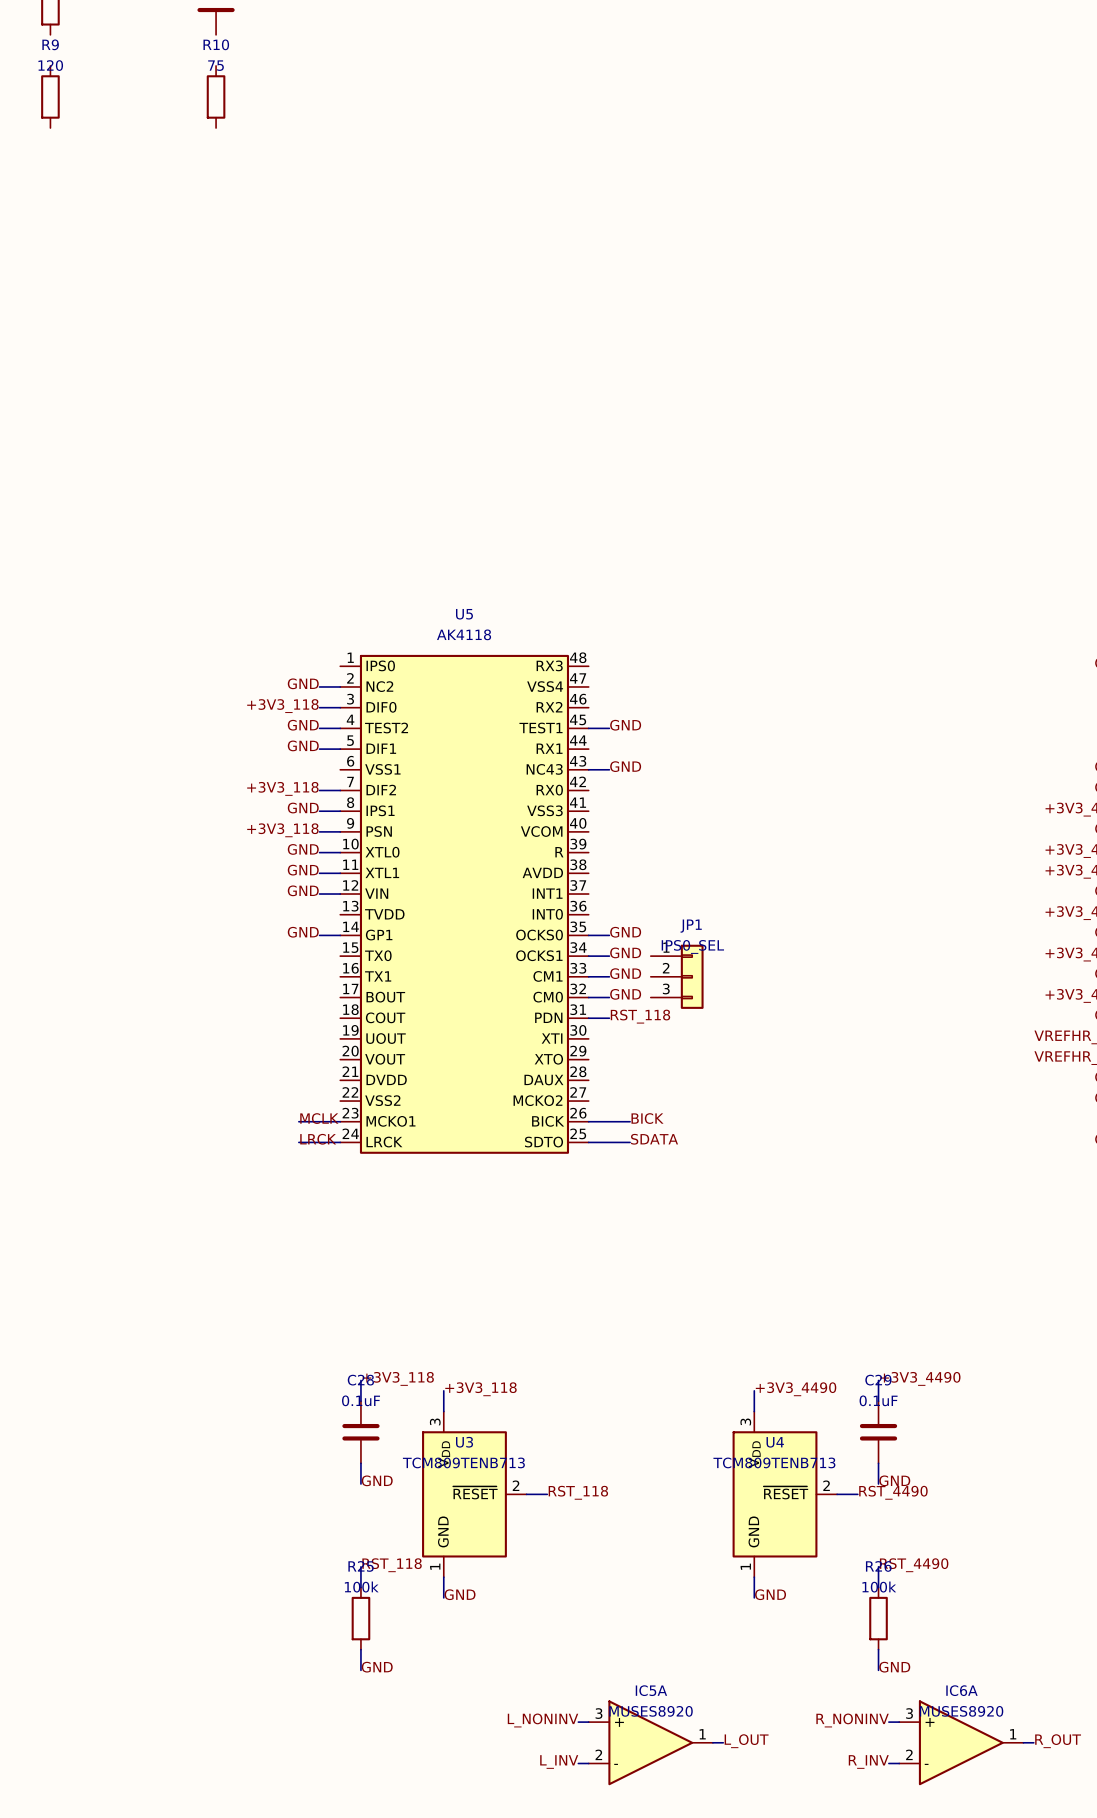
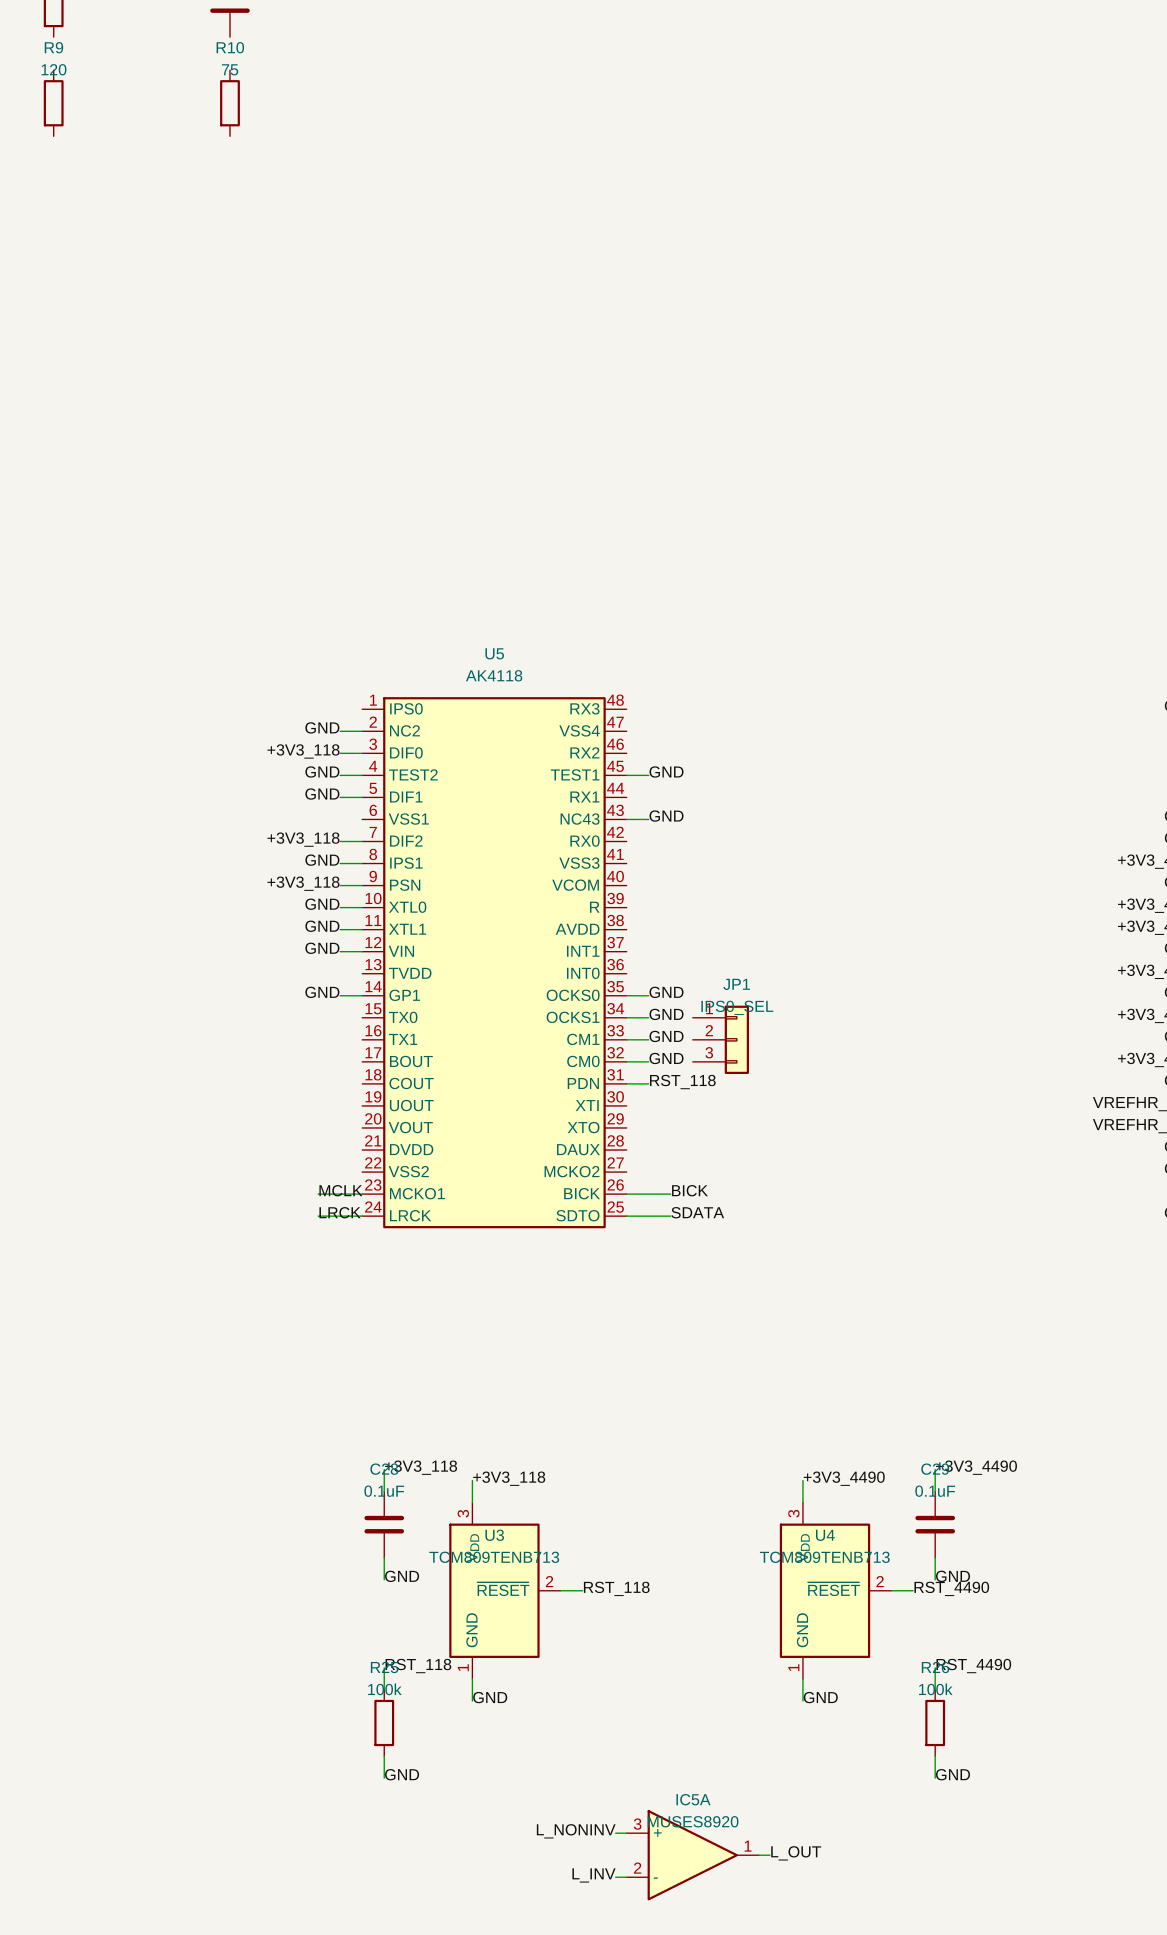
label: R_NONINV (852, 1720) -> none
wire: (888, 1722) (899, 1722) -> none
label: R_OUT (1058, 1741) -> none
IC6A: MUSES8920 (961, 1742) -> none
wire: (1023, 1742) (1033, 1742) -> none
label: R_INV (868, 1761) -> none
wire: (888, 1763) (899, 1763) -> none

